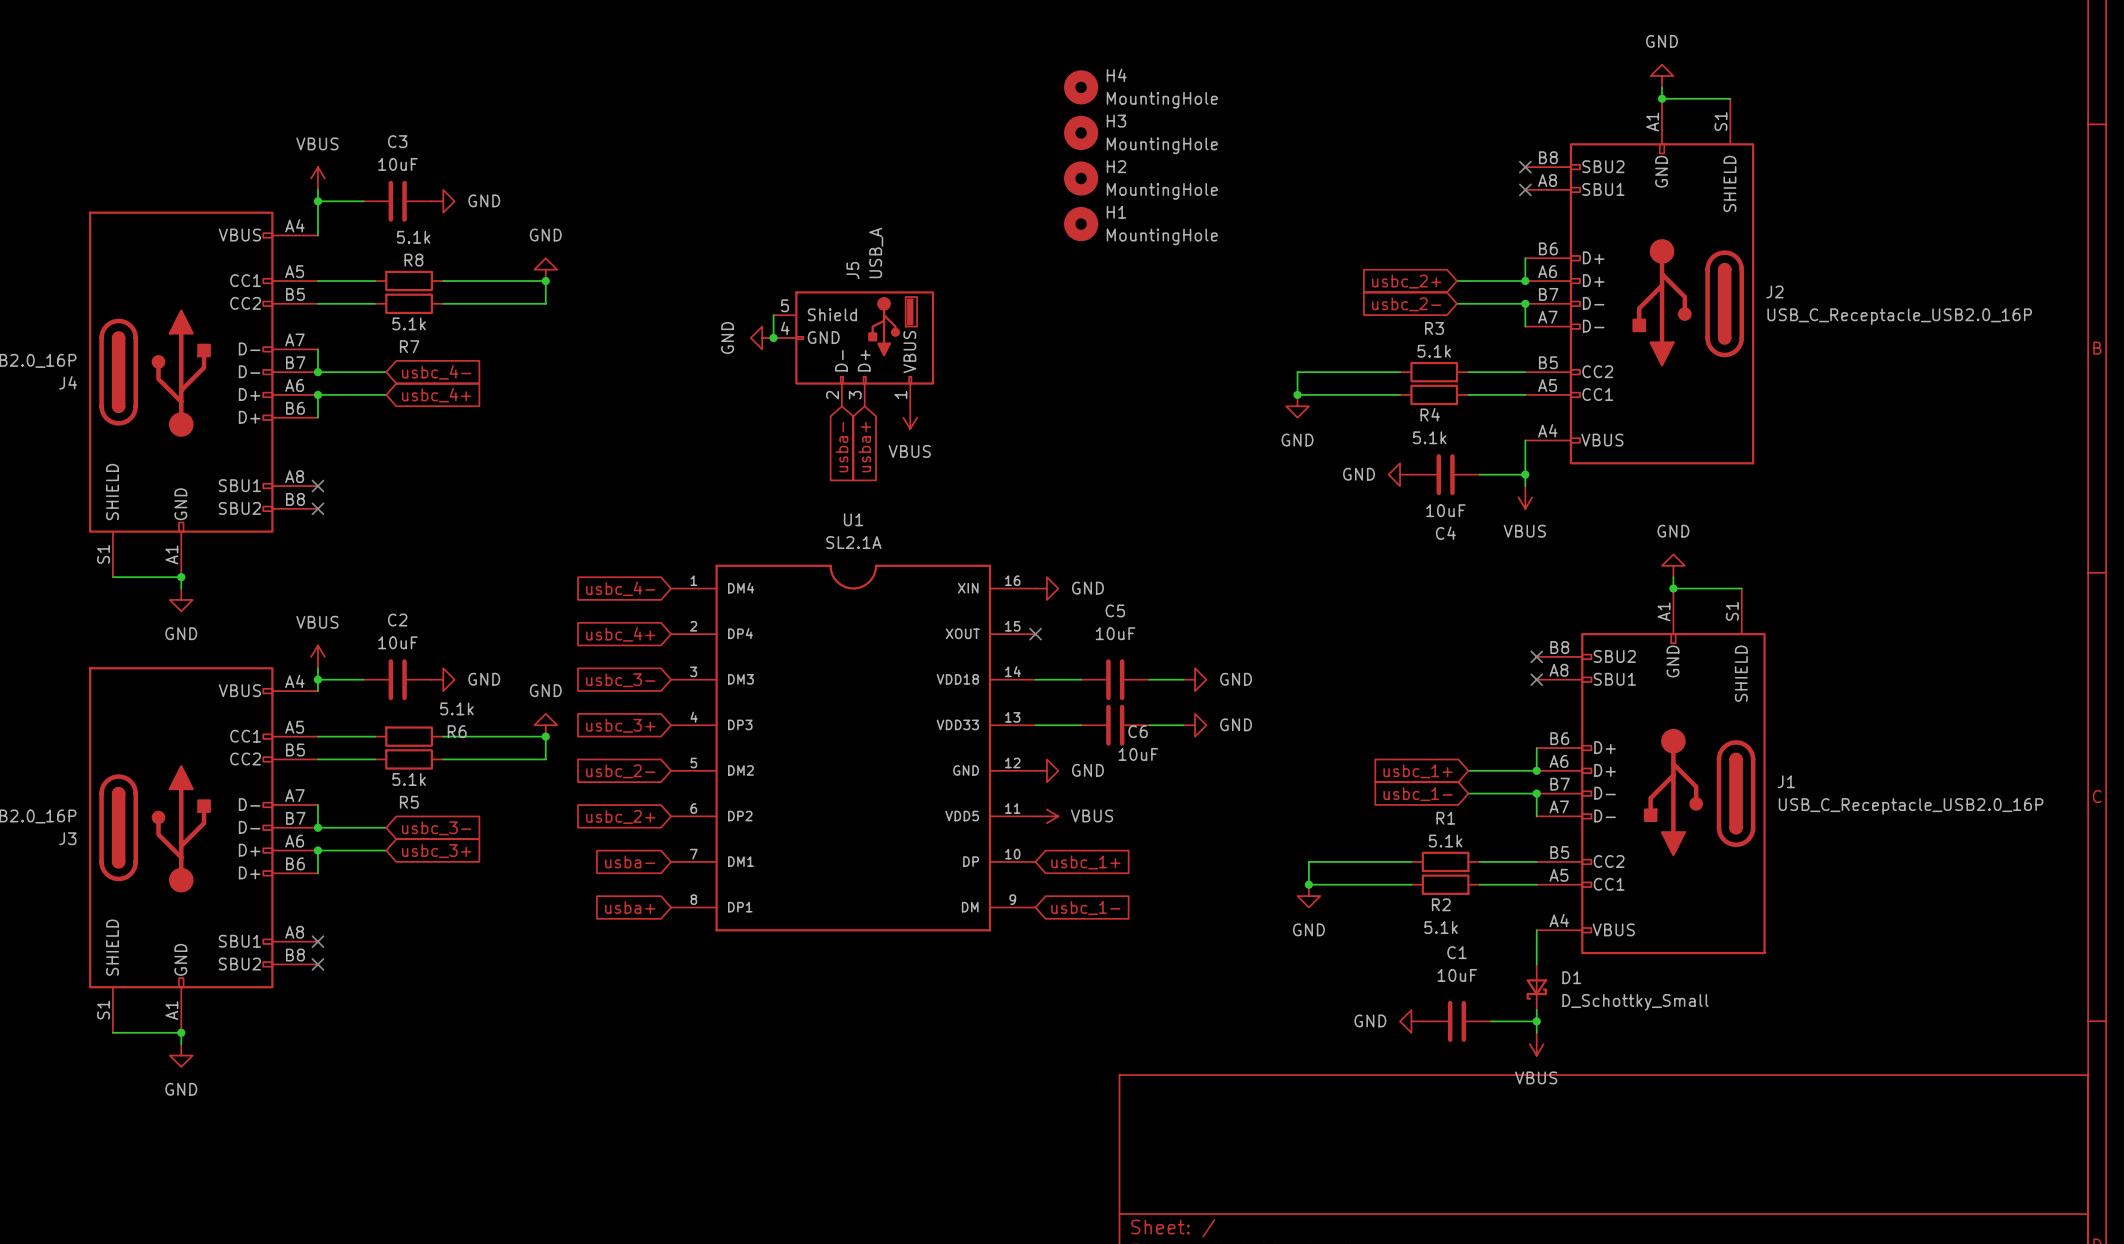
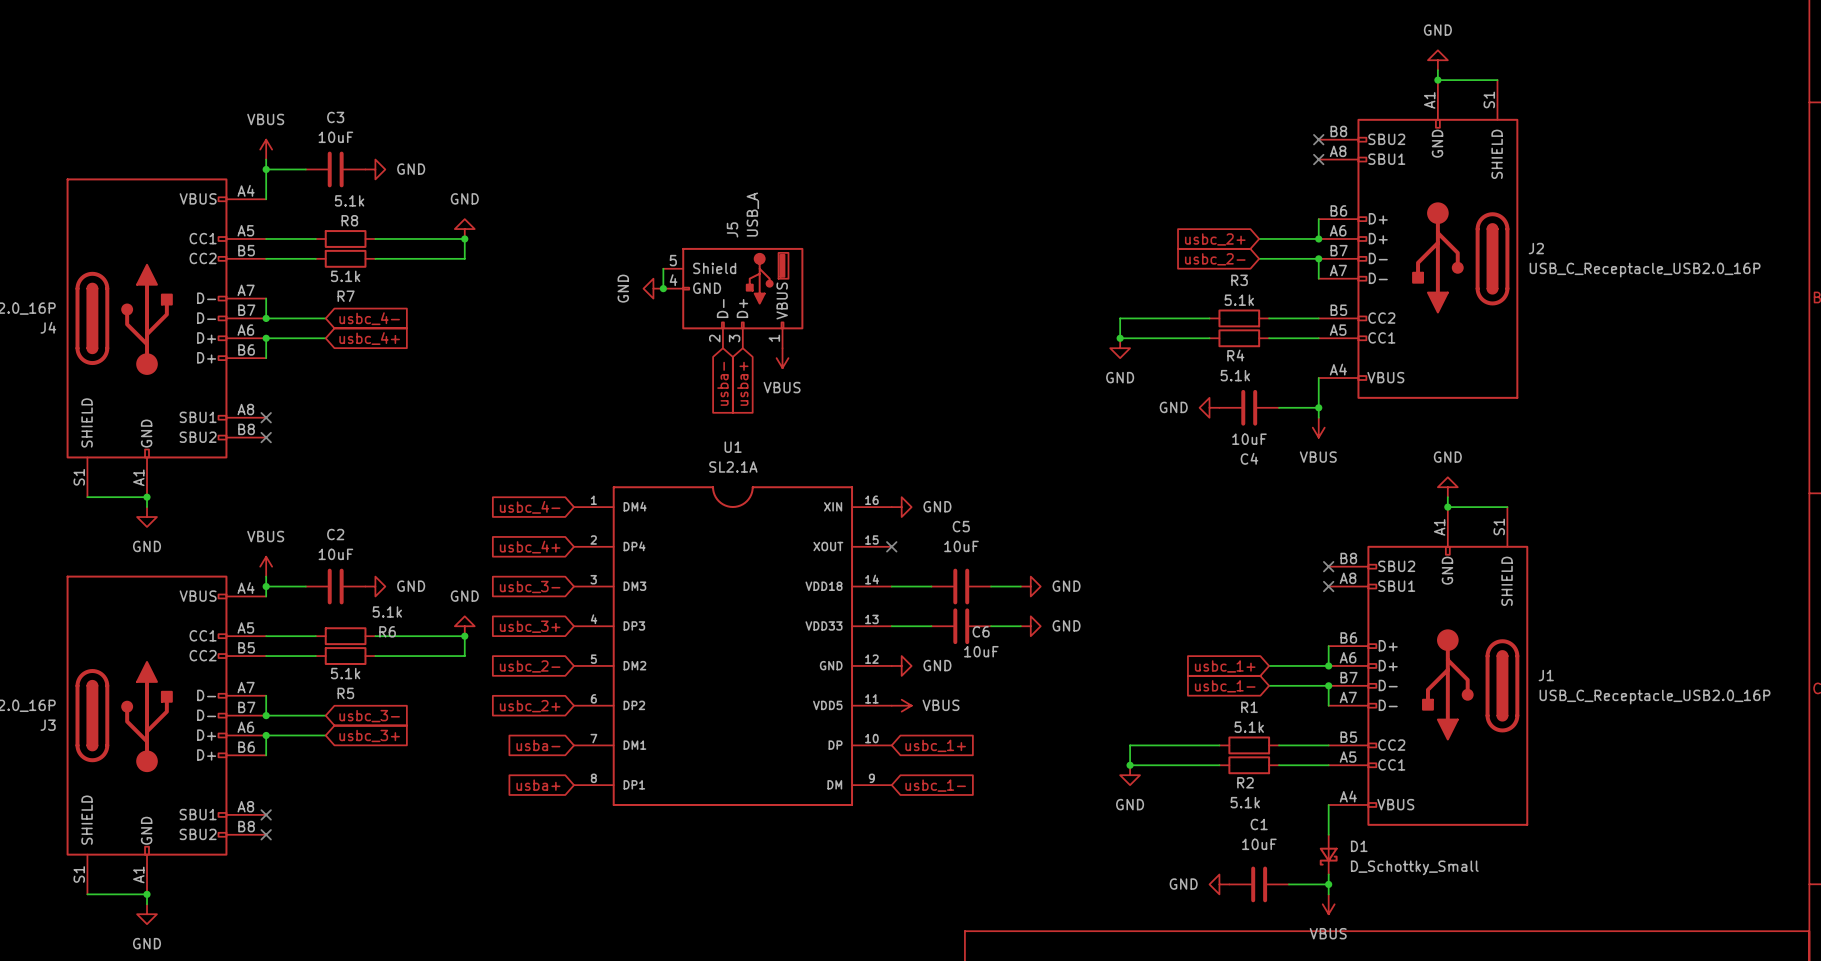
H4: MountingHole (1081, 87) -> none
H3: MountingHole (1081, 132) -> none
H2: MountingHole (1081, 178) -> none
H1: MountingHole (1081, 224) -> none

